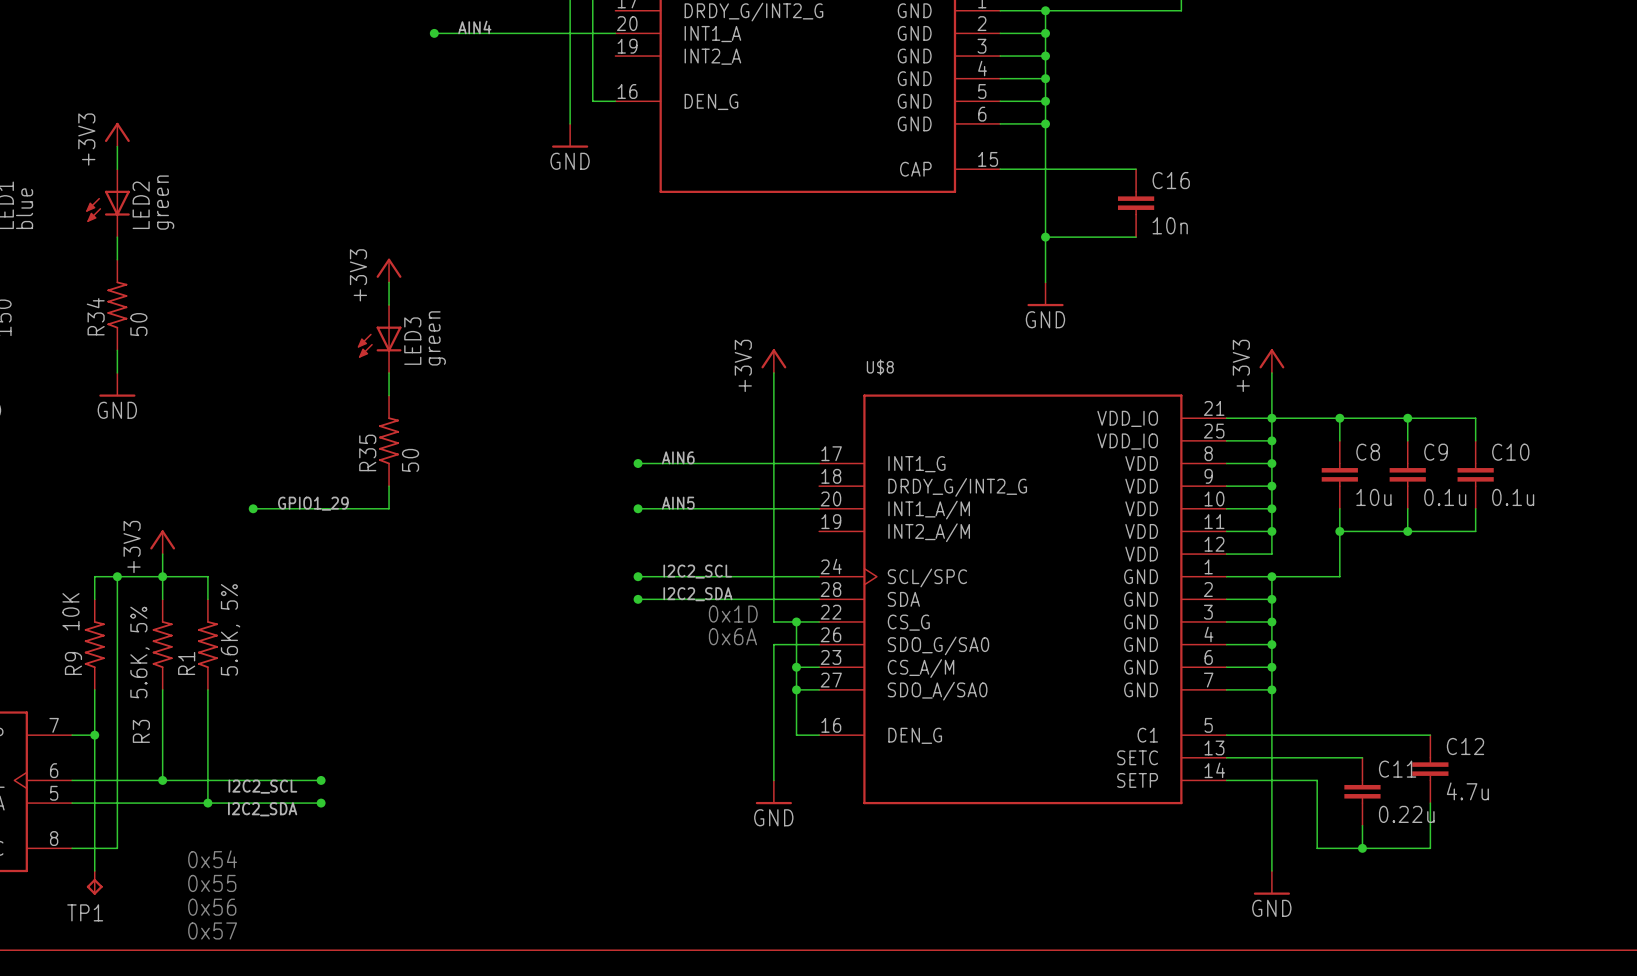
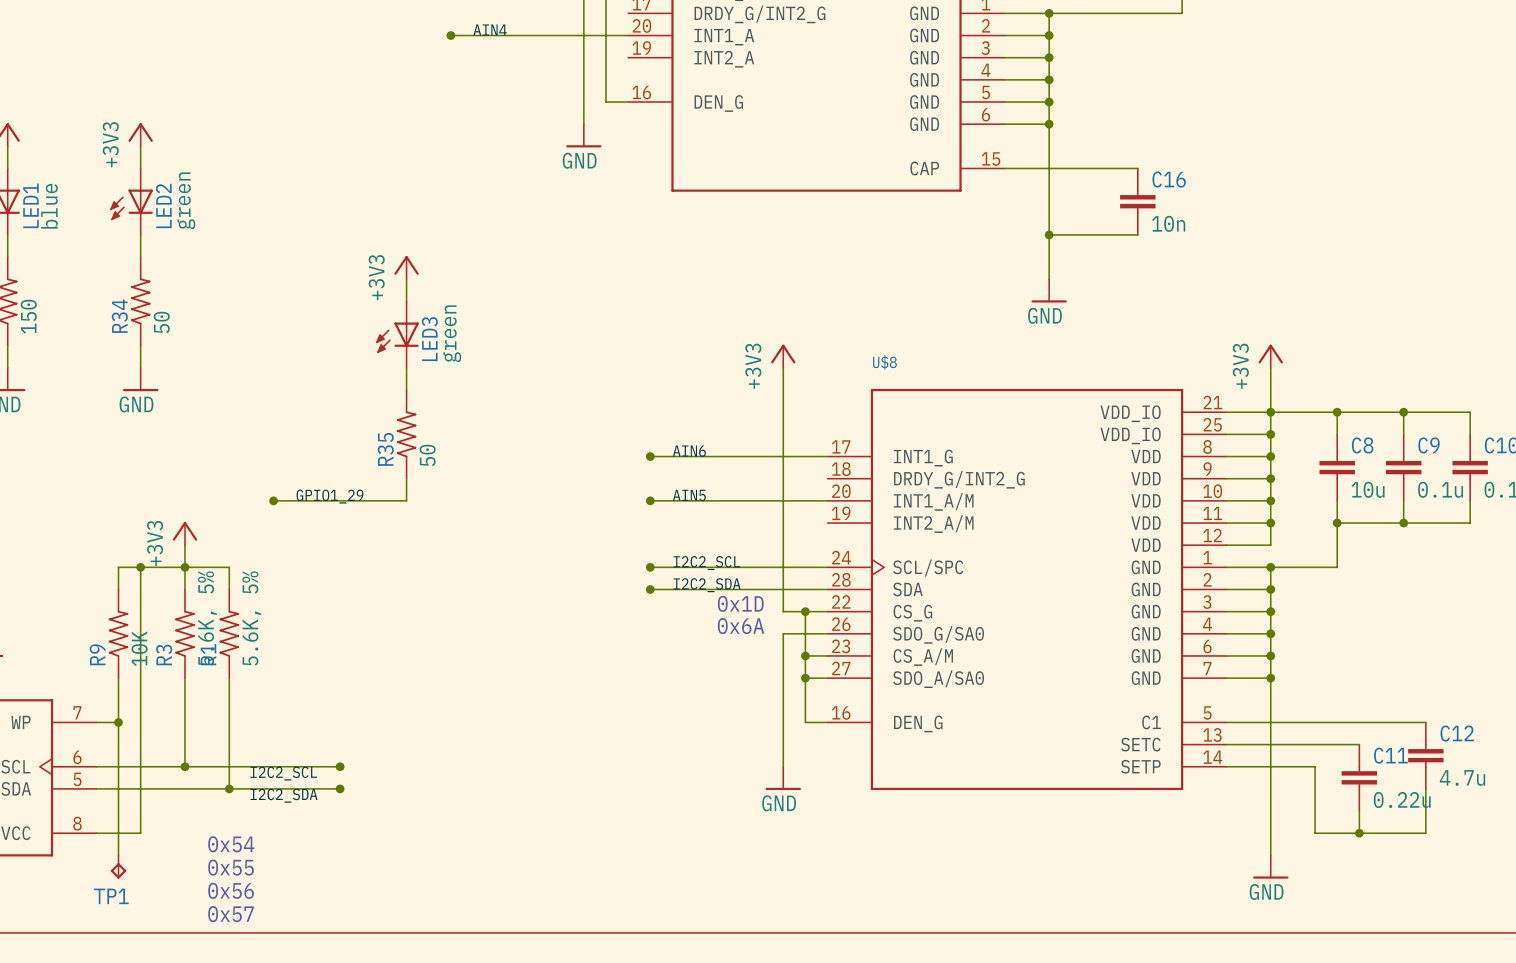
R9 value position: 10K (70, 611) -> 10K (139, 648)
R3 value position: 5.6K, 5% (140, 652) -> 5.6K, 5% (207, 618)
R3 name position: R3 (141, 731) -> R3 (164, 654)

